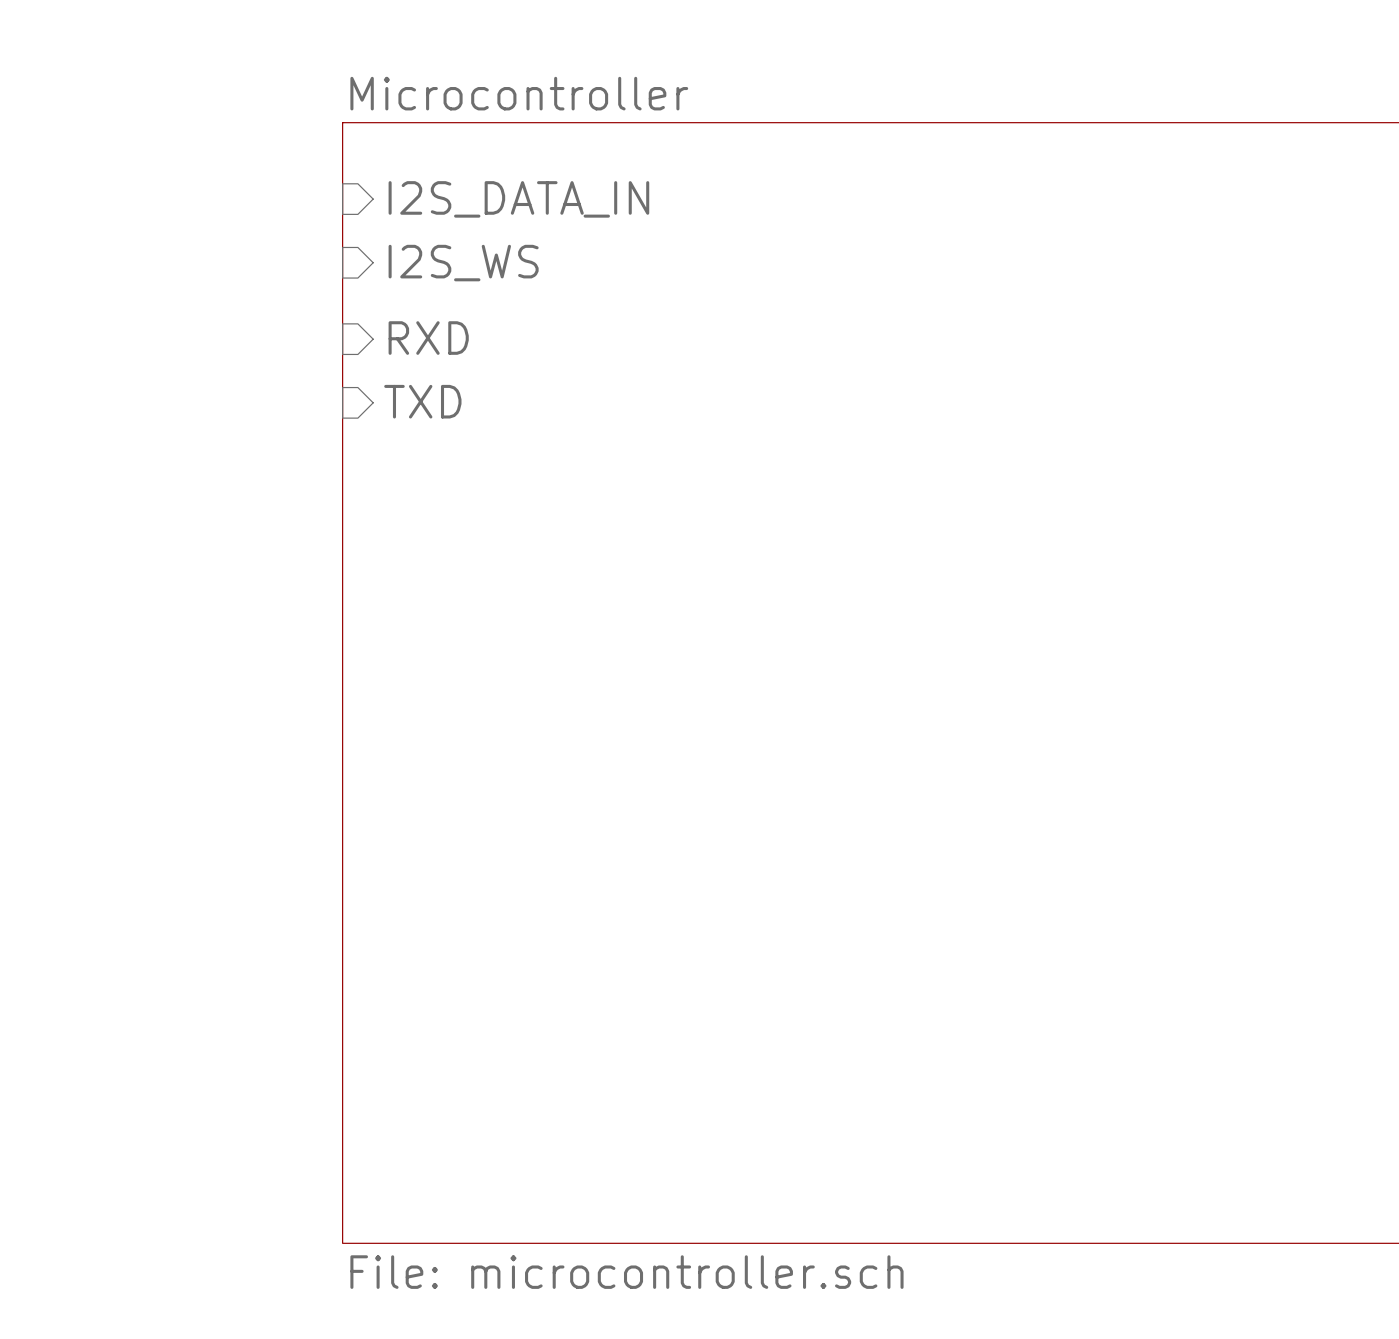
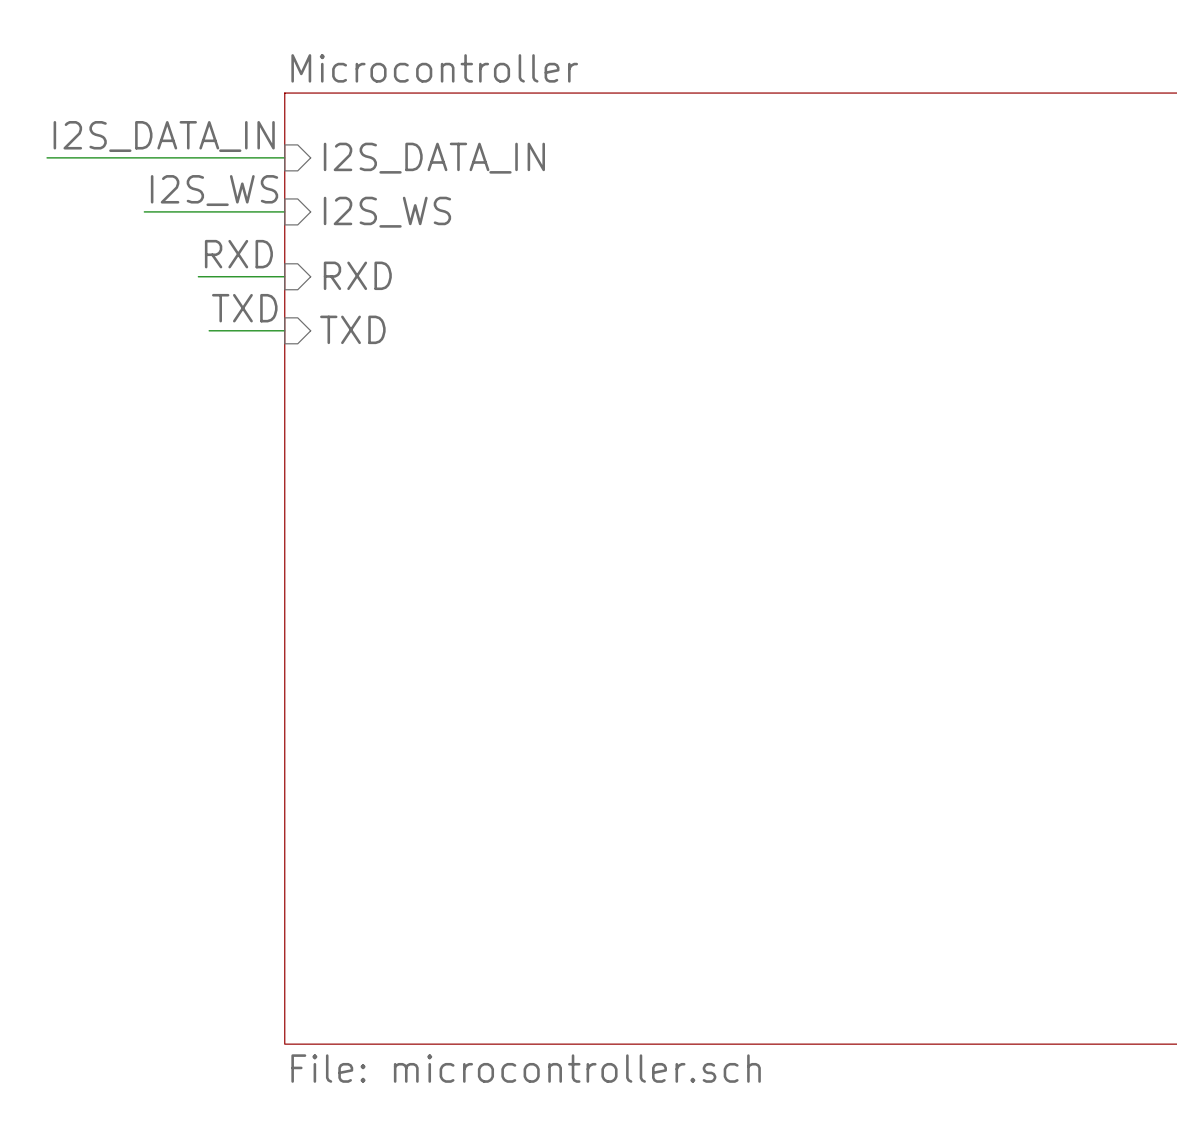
label: none -> I2S_DATA_IN (164, 136)
wire: none -> (46, 157) (284, 157)
label: none -> I2S_WS (214, 190)
wire: none -> (144, 211) (284, 211)
label: none -> RXD (238, 254)
wire: none -> (198, 276) (284, 276)
label: none -> TXD (244, 308)
wire: none -> (209, 330) (284, 330)

